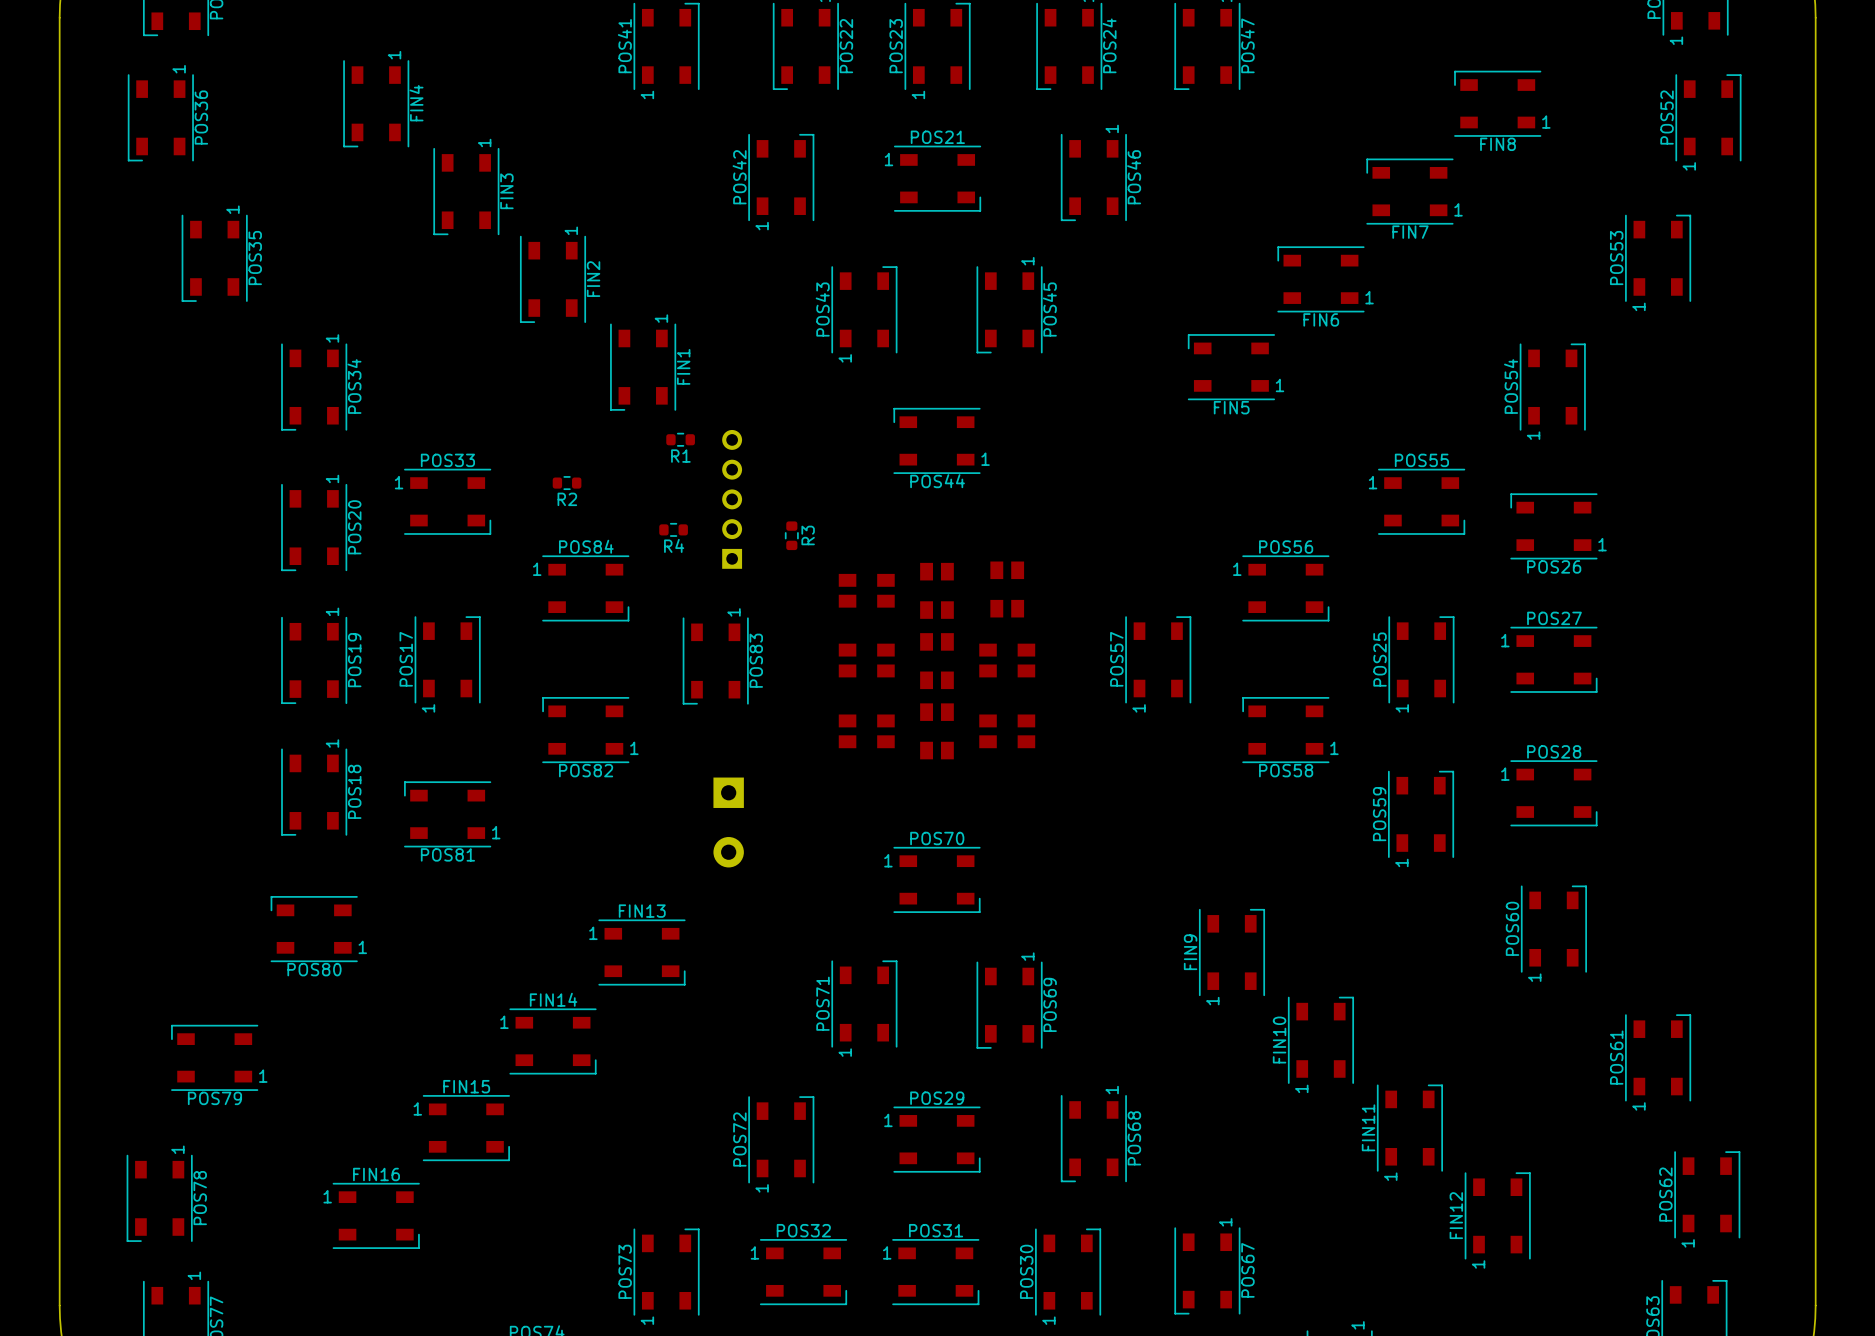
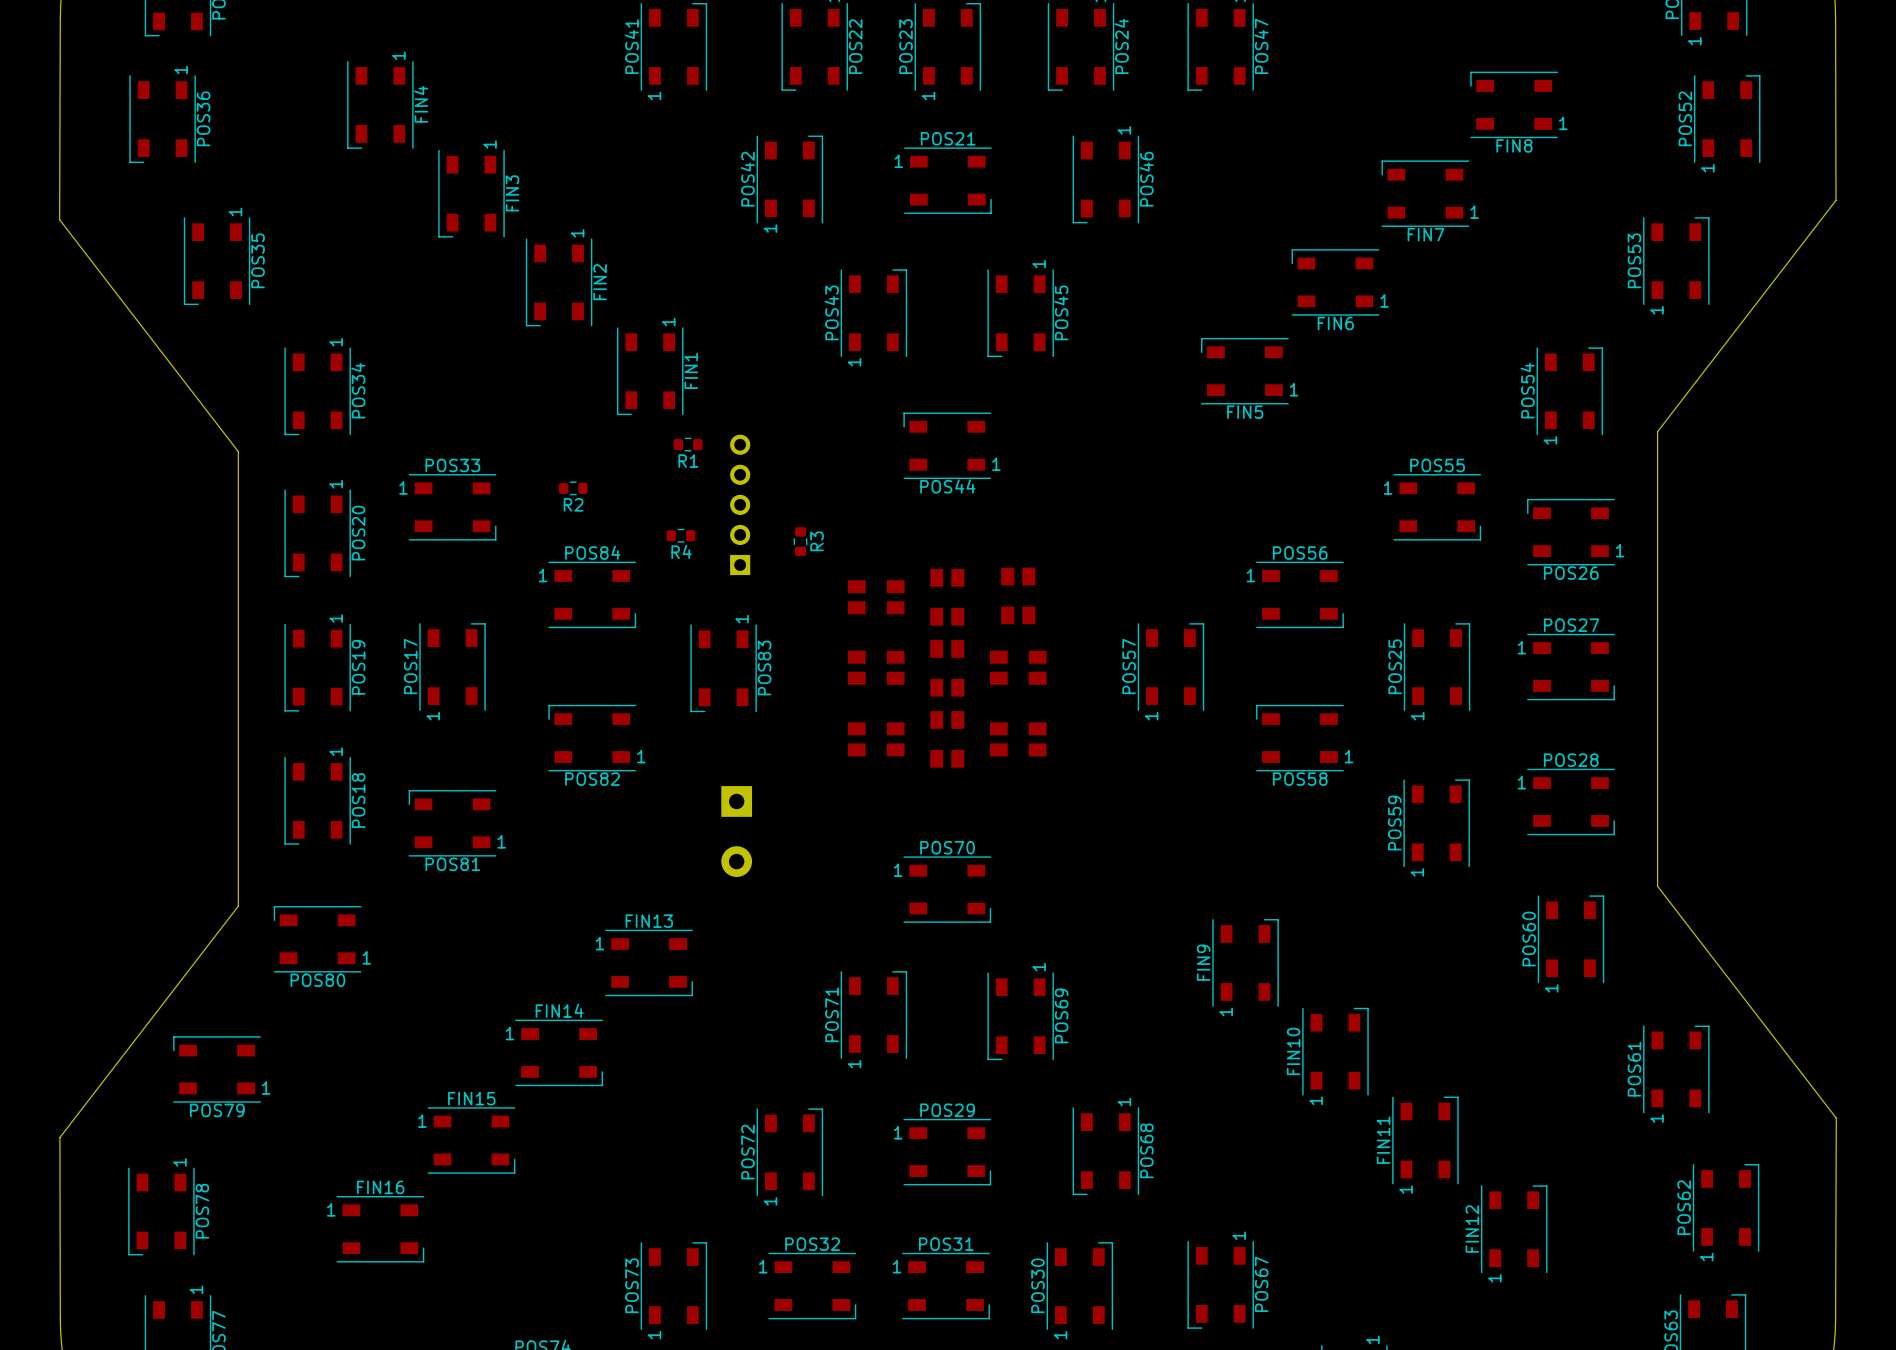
board edge: (59, 17) (59, 1305) -> (60, 18) (59, 219) (238, 451) (238, 906) (59, 1137) (60, 1319)
board edge: (1815, 17) (1815, 1305) -> (1835, 18) (1835, 200) (1657, 431) (1657, 886) (1836, 1118) (1835, 1319)

